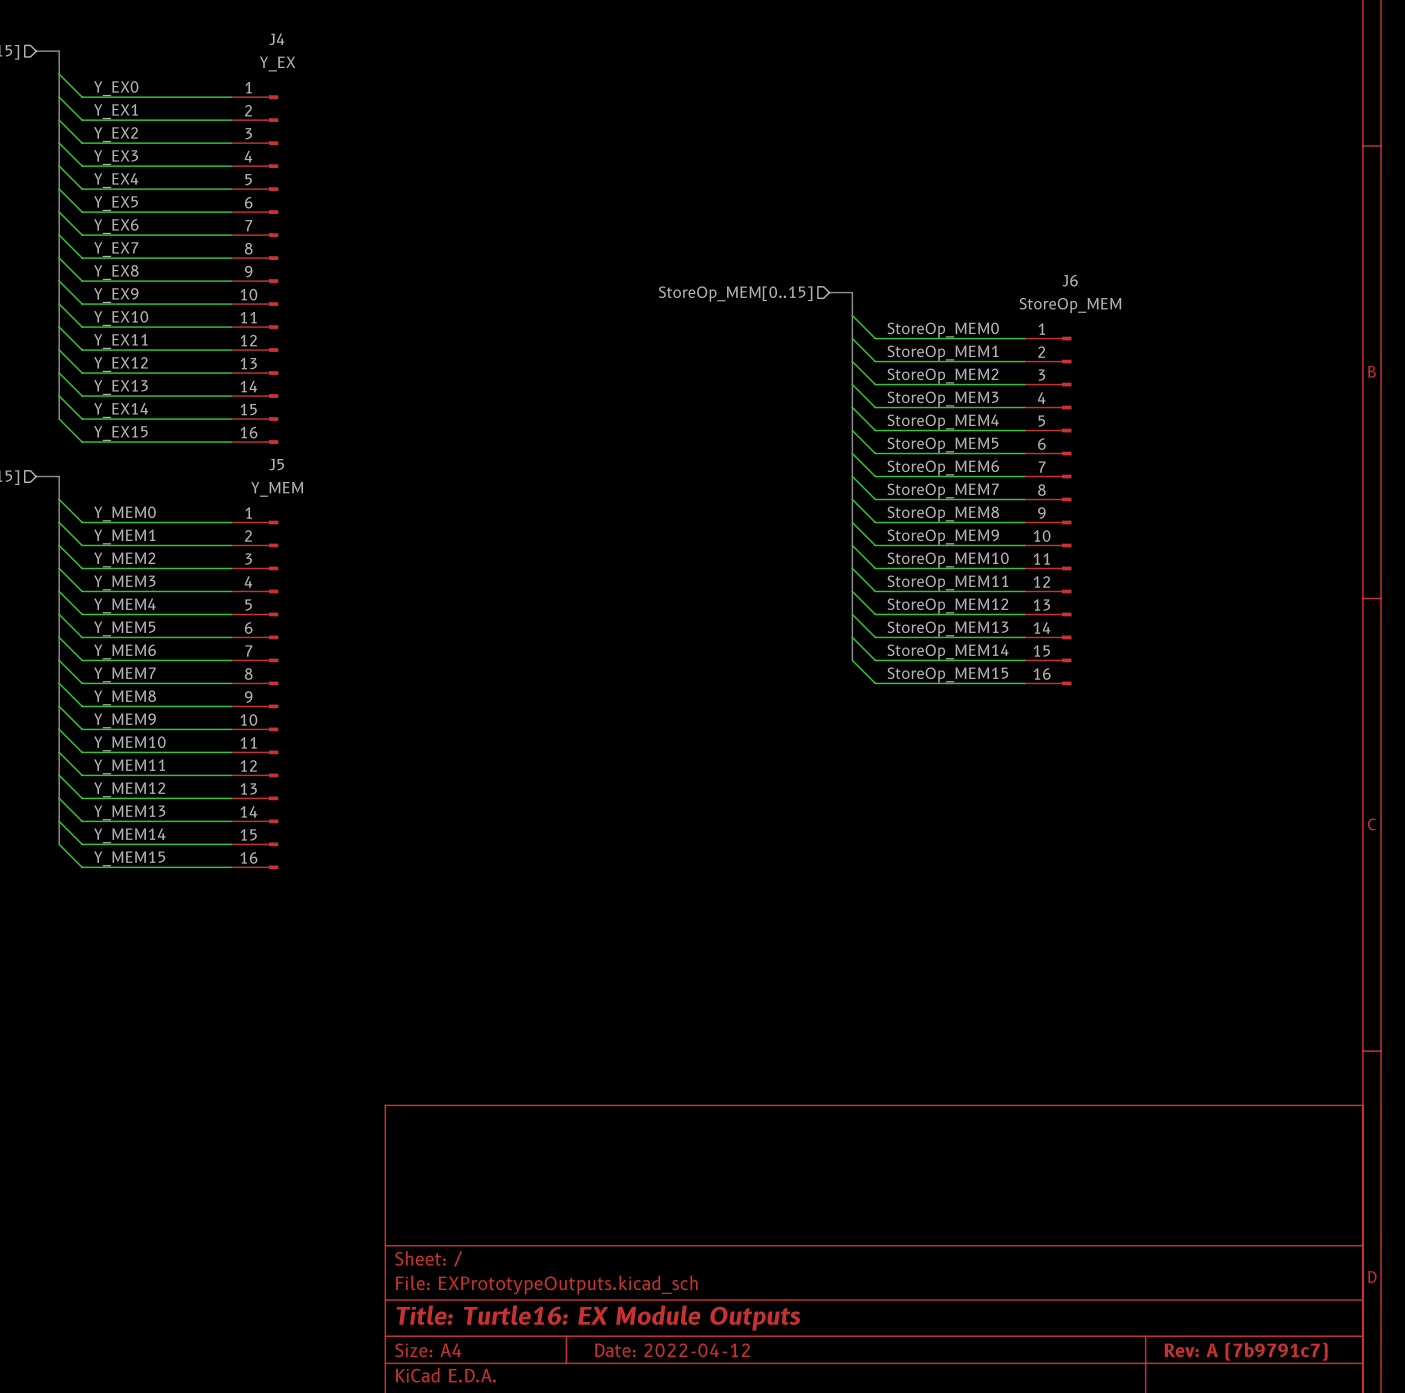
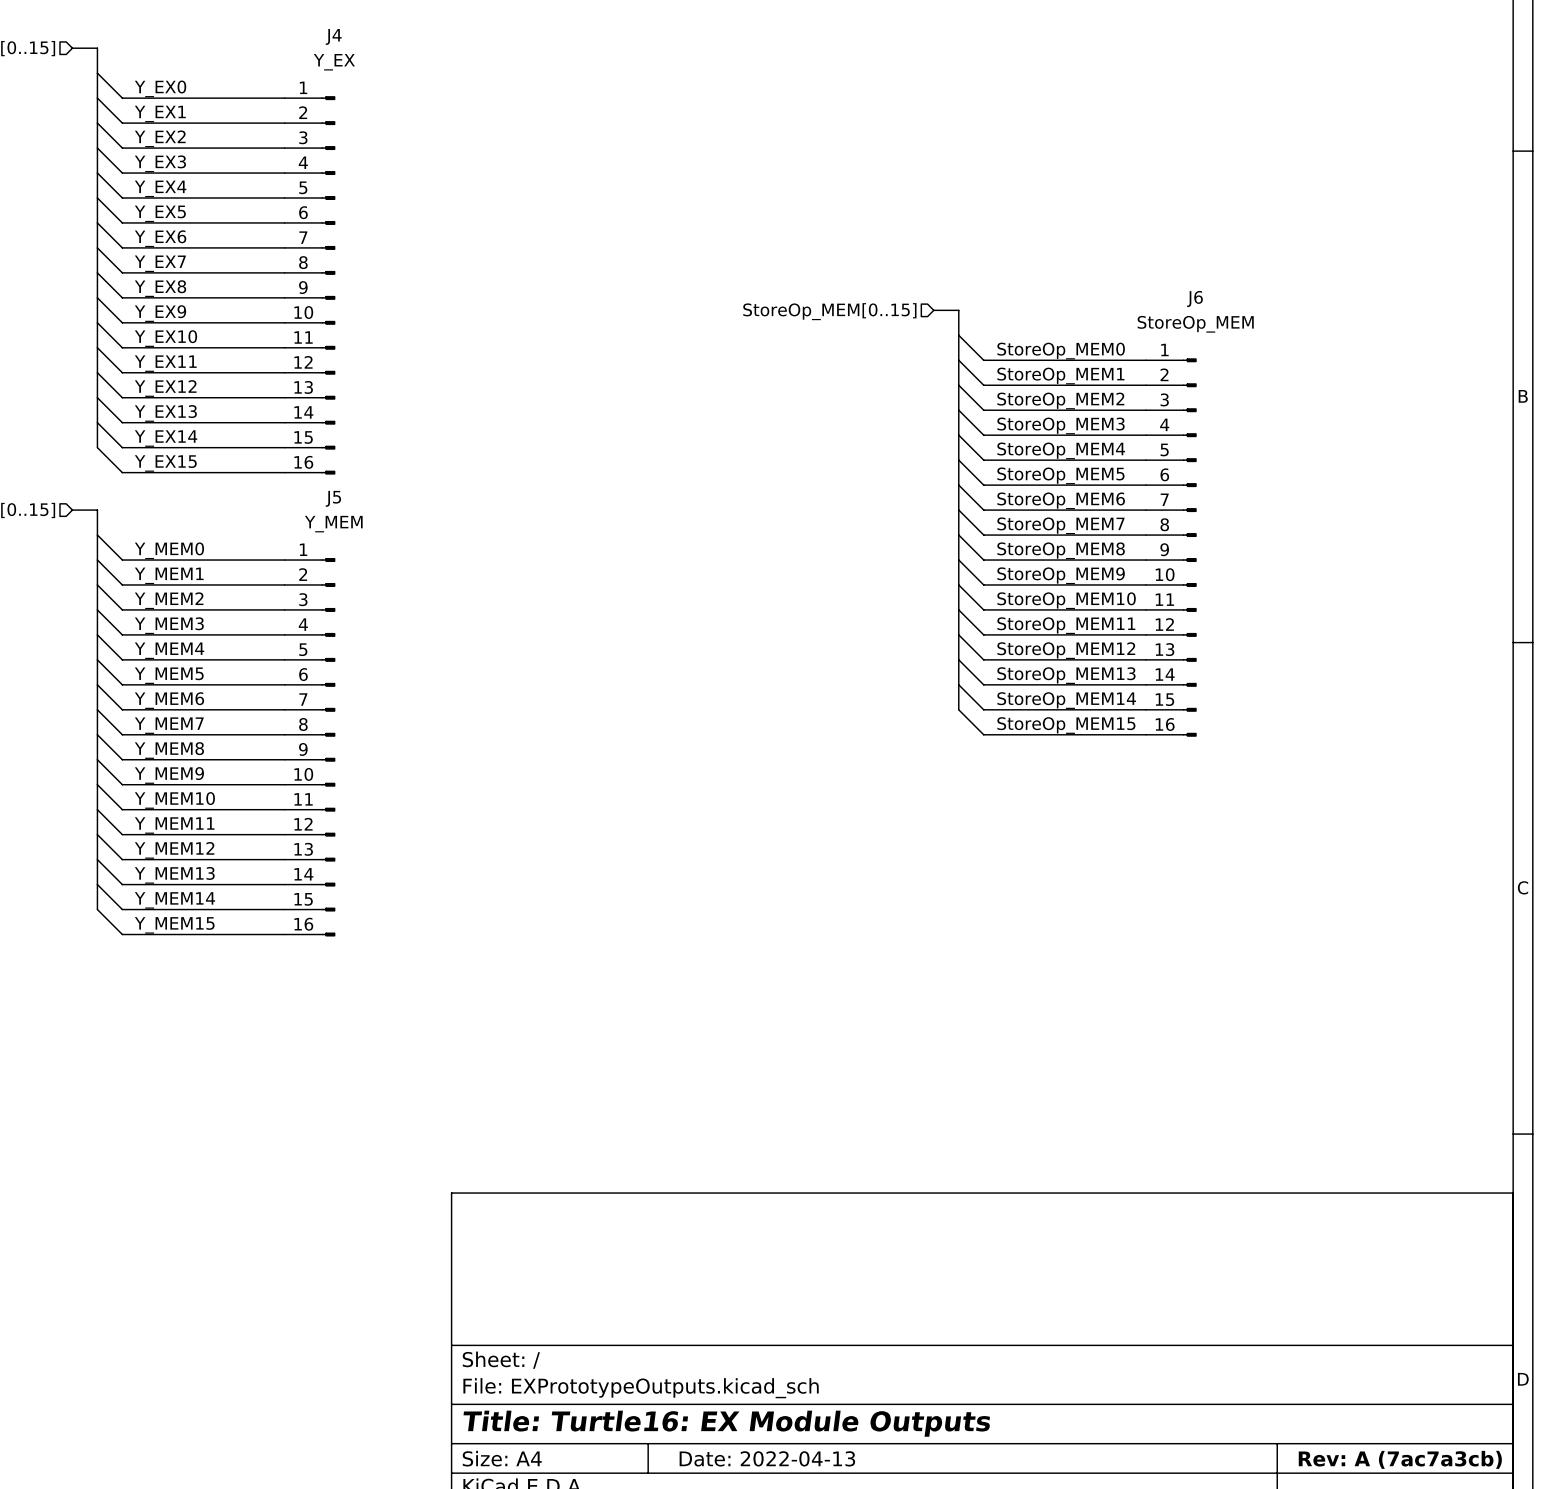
title block: Date: 2022-04-12 (672, 1350) -> Date: 2022-04-13 (767, 1458)
title block: Rev: A (7b9791c7) (1246, 1351) -> Rev: A (7ac7a3cb) (1400, 1459)

